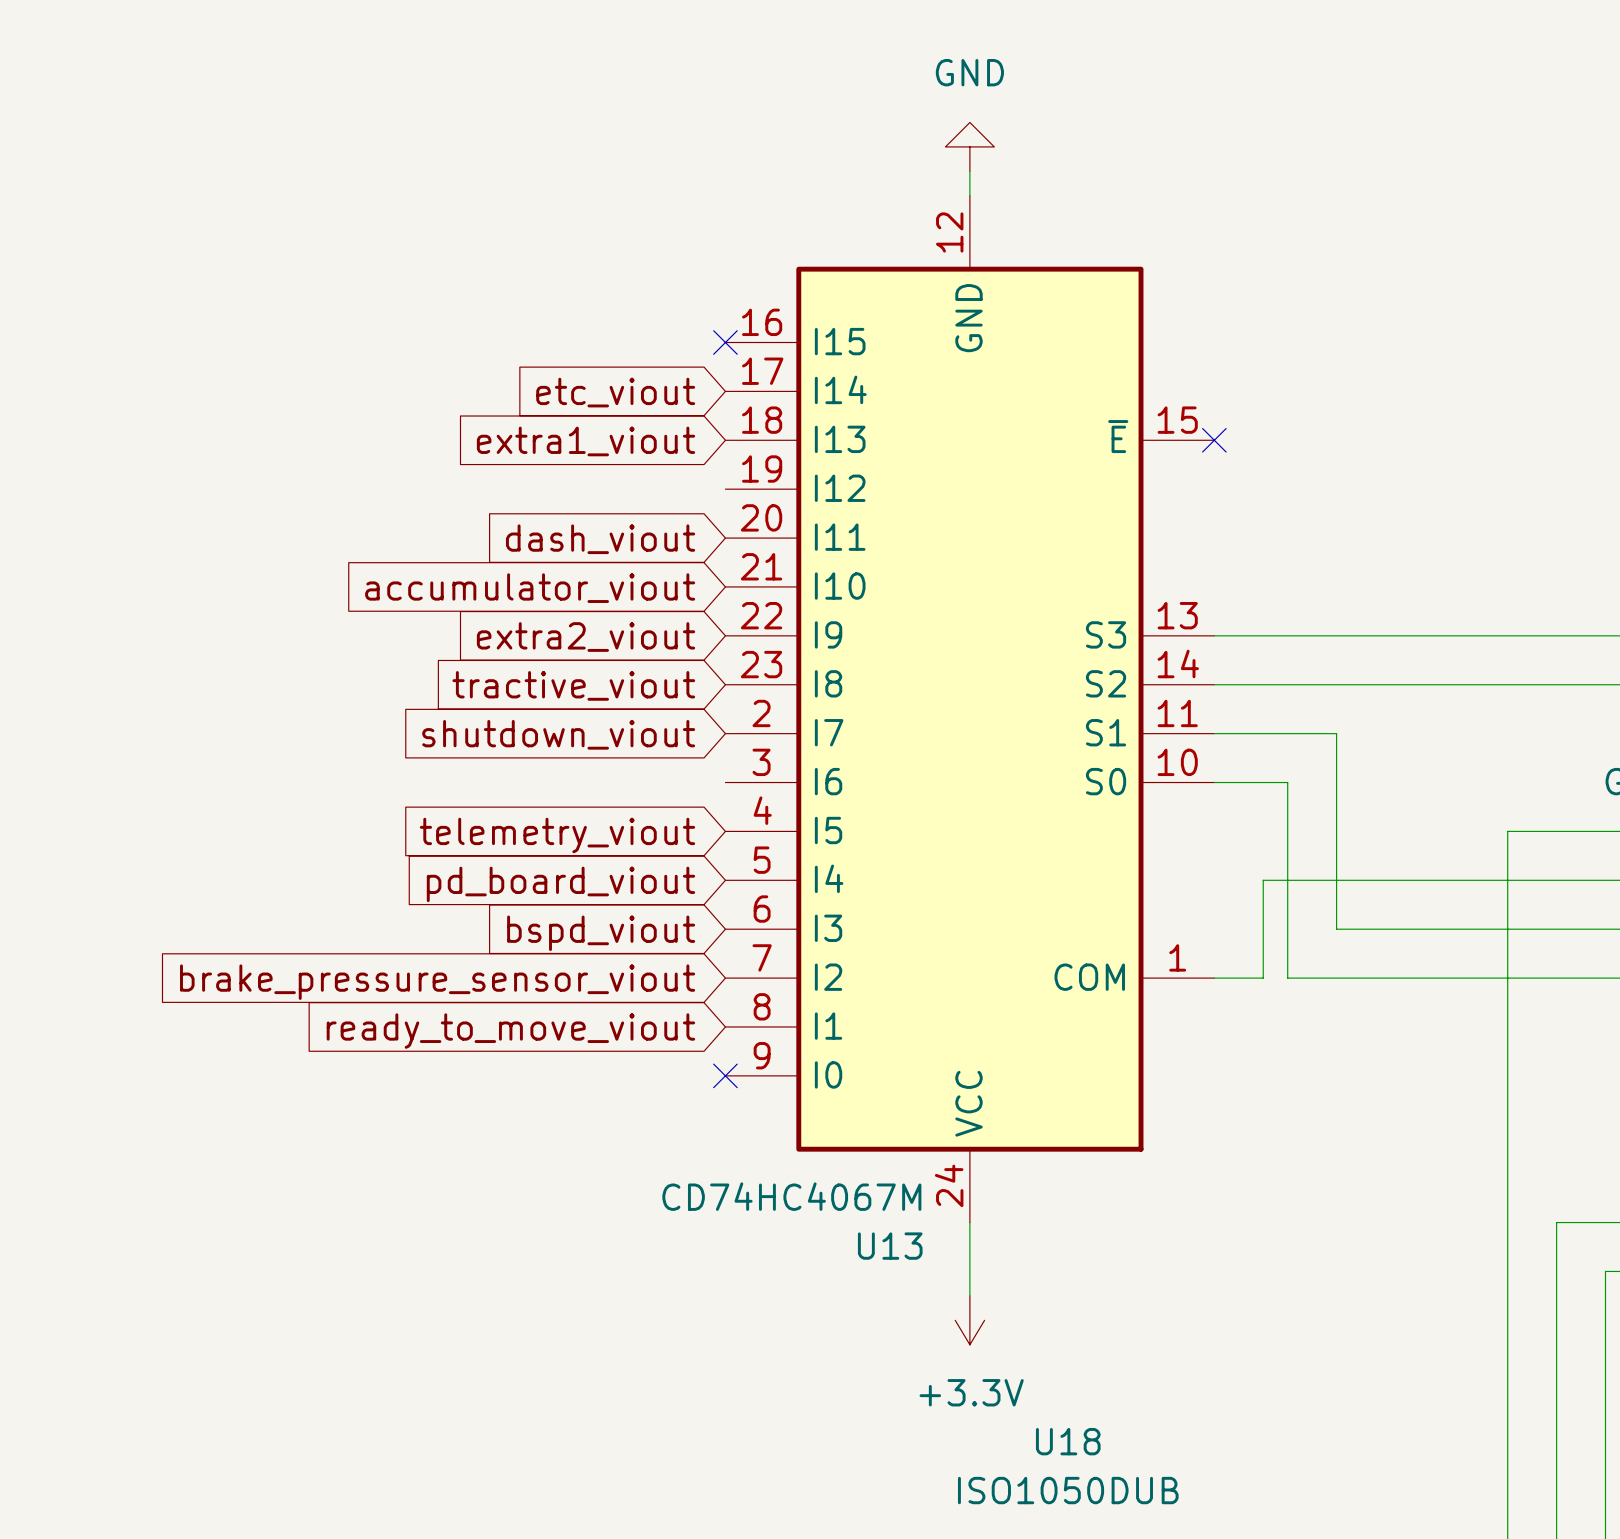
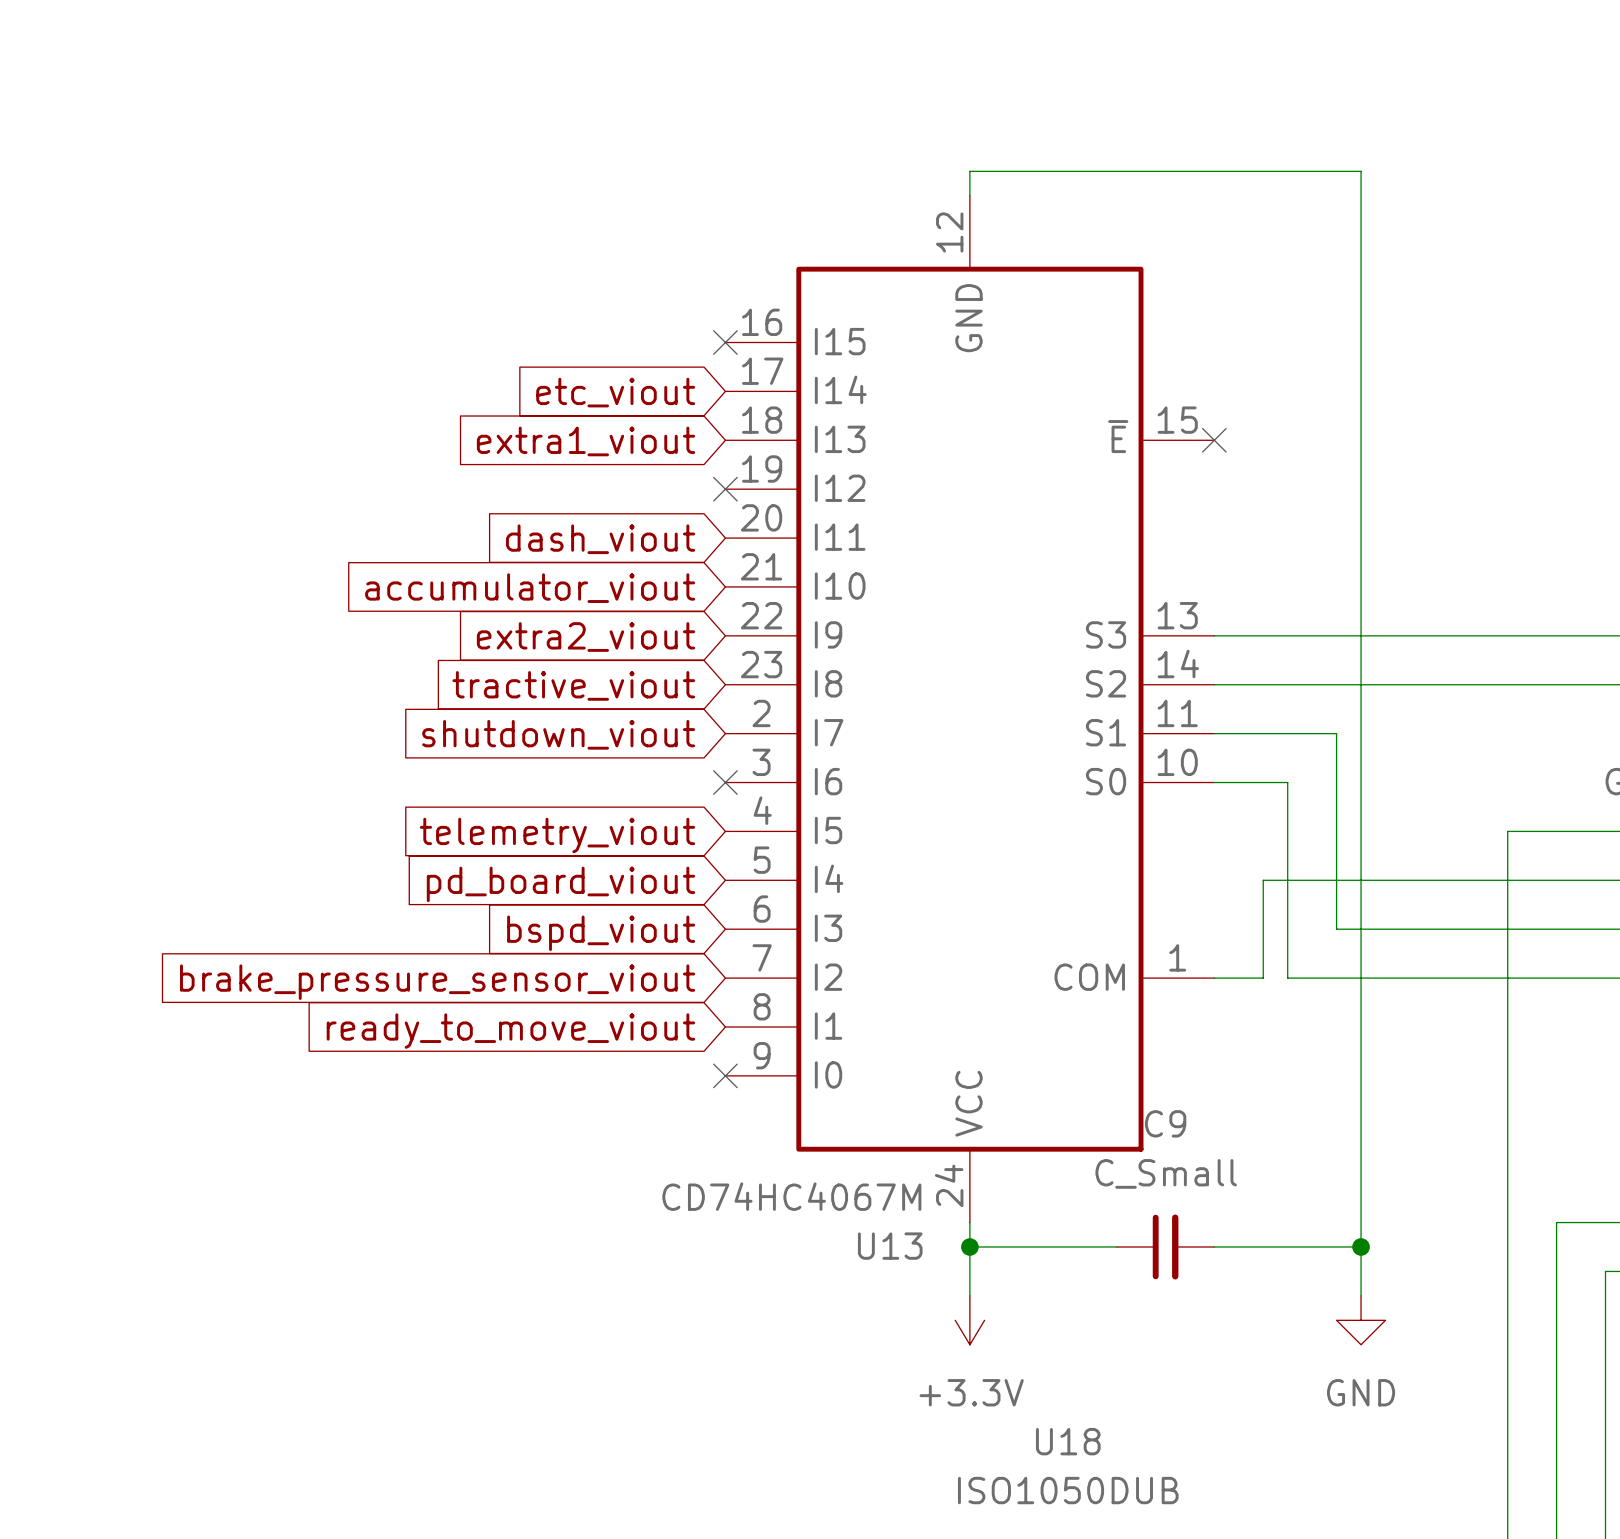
power symbol: GND (969, 146) -> none
wire: none -> (969, 171) (1361, 171) (1361, 1295)
no-connect mark: none -> (725, 489)
no-connect mark: none -> (725, 782)
wire: none -> (969, 1247) (1116, 1247)
junction: none -> (969, 1247)
C9: none -> C_Small (1165, 1247)
wire: none -> (1214, 1247) (1361, 1247)
junction: none -> (1361, 1247)
power symbol: none -> GND (1361, 1320)

